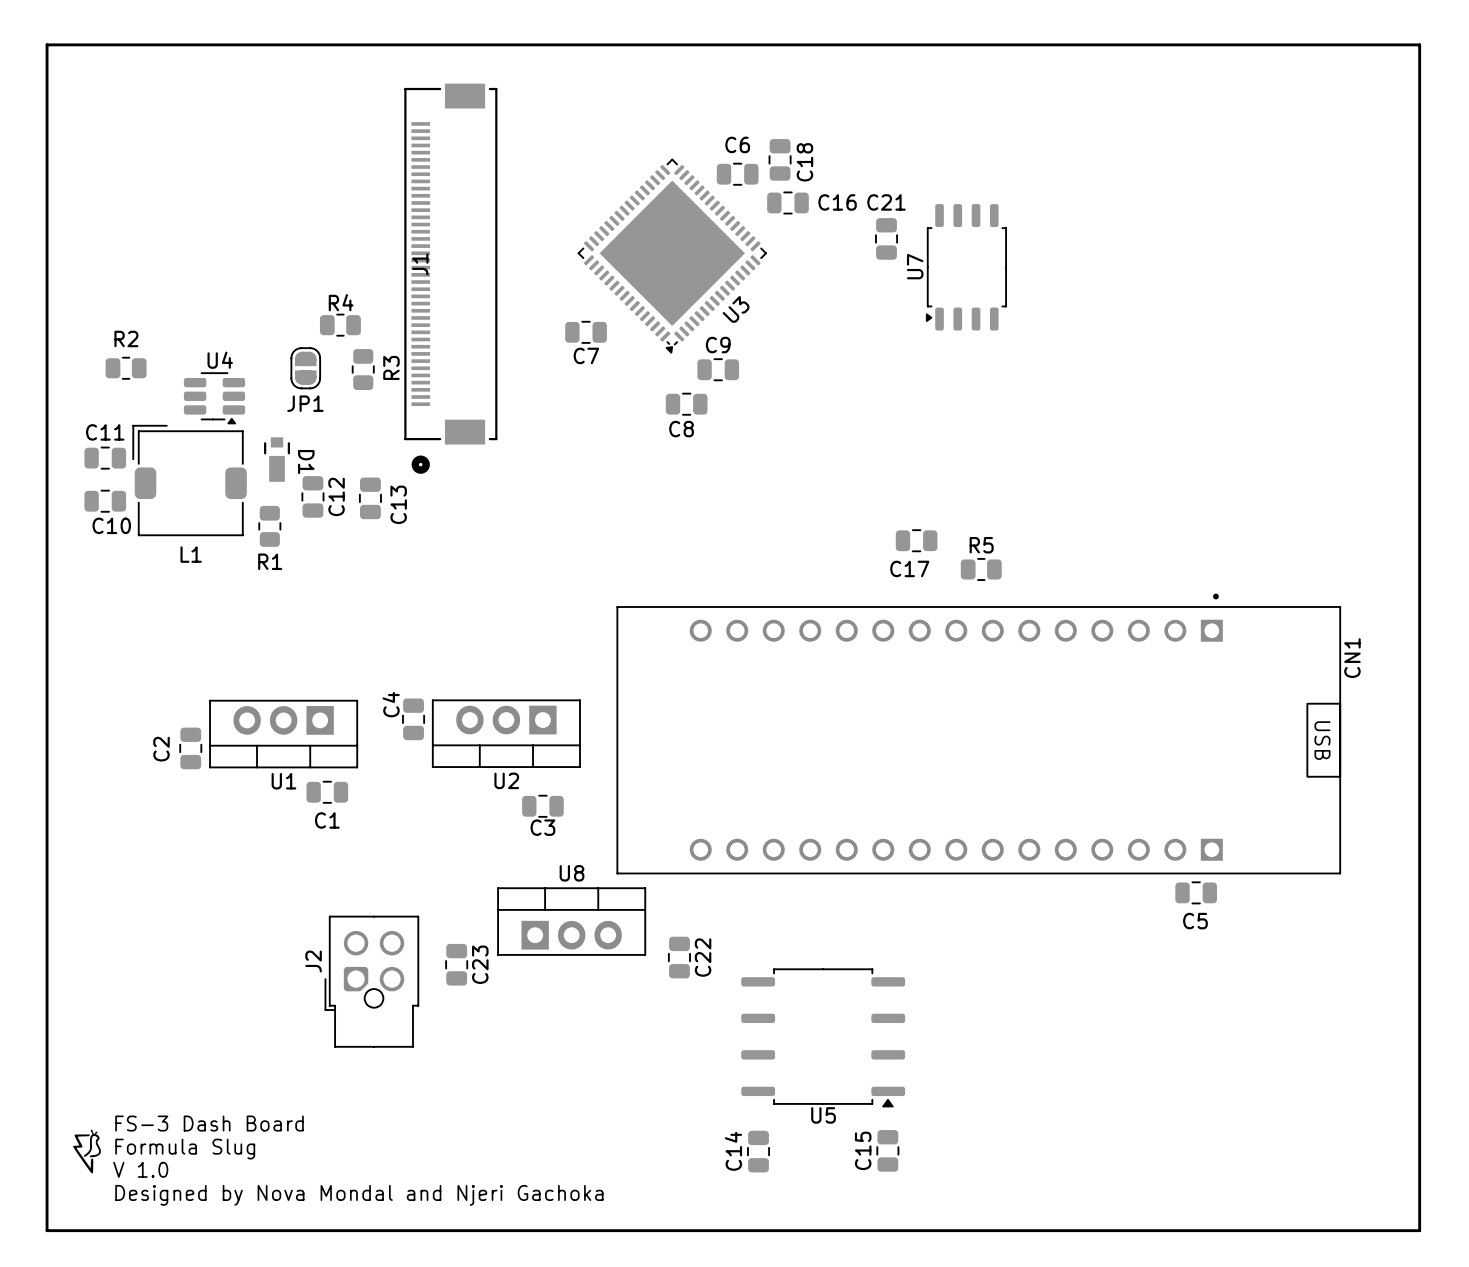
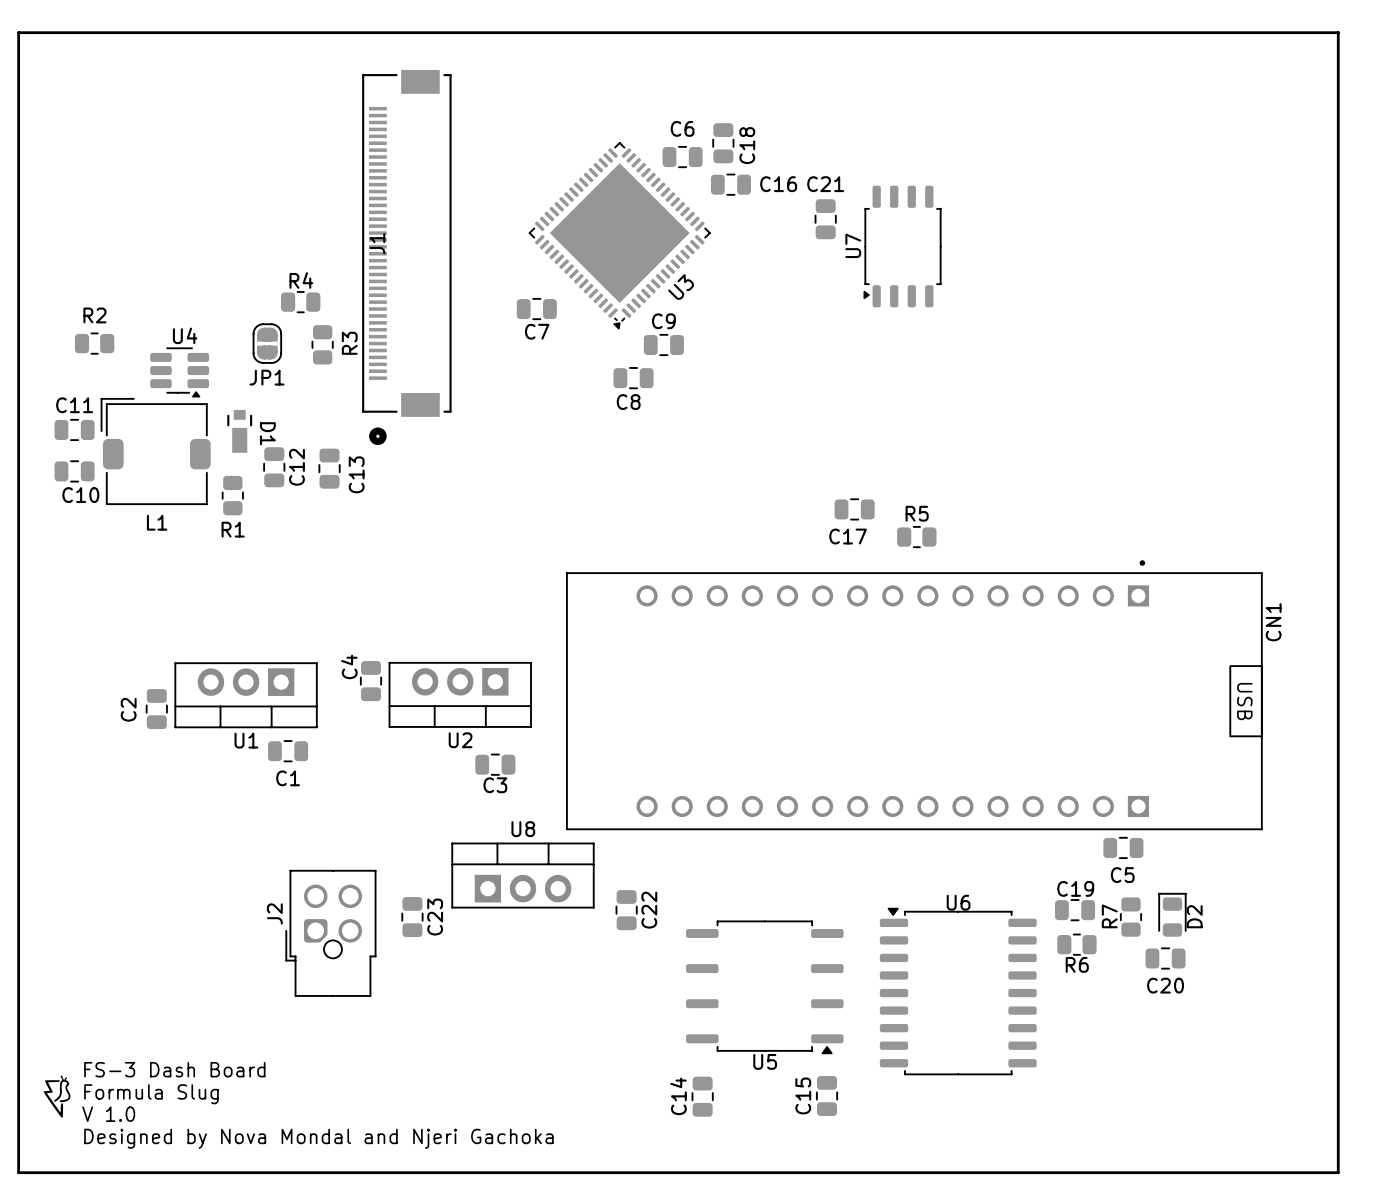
C19: none -> (1075, 910)
D2: none -> (1172, 914)
R7: none -> (1130, 917)
R6: none -> (1076, 944)
C20: none -> (1165, 958)
U6: none -> (958, 991)

